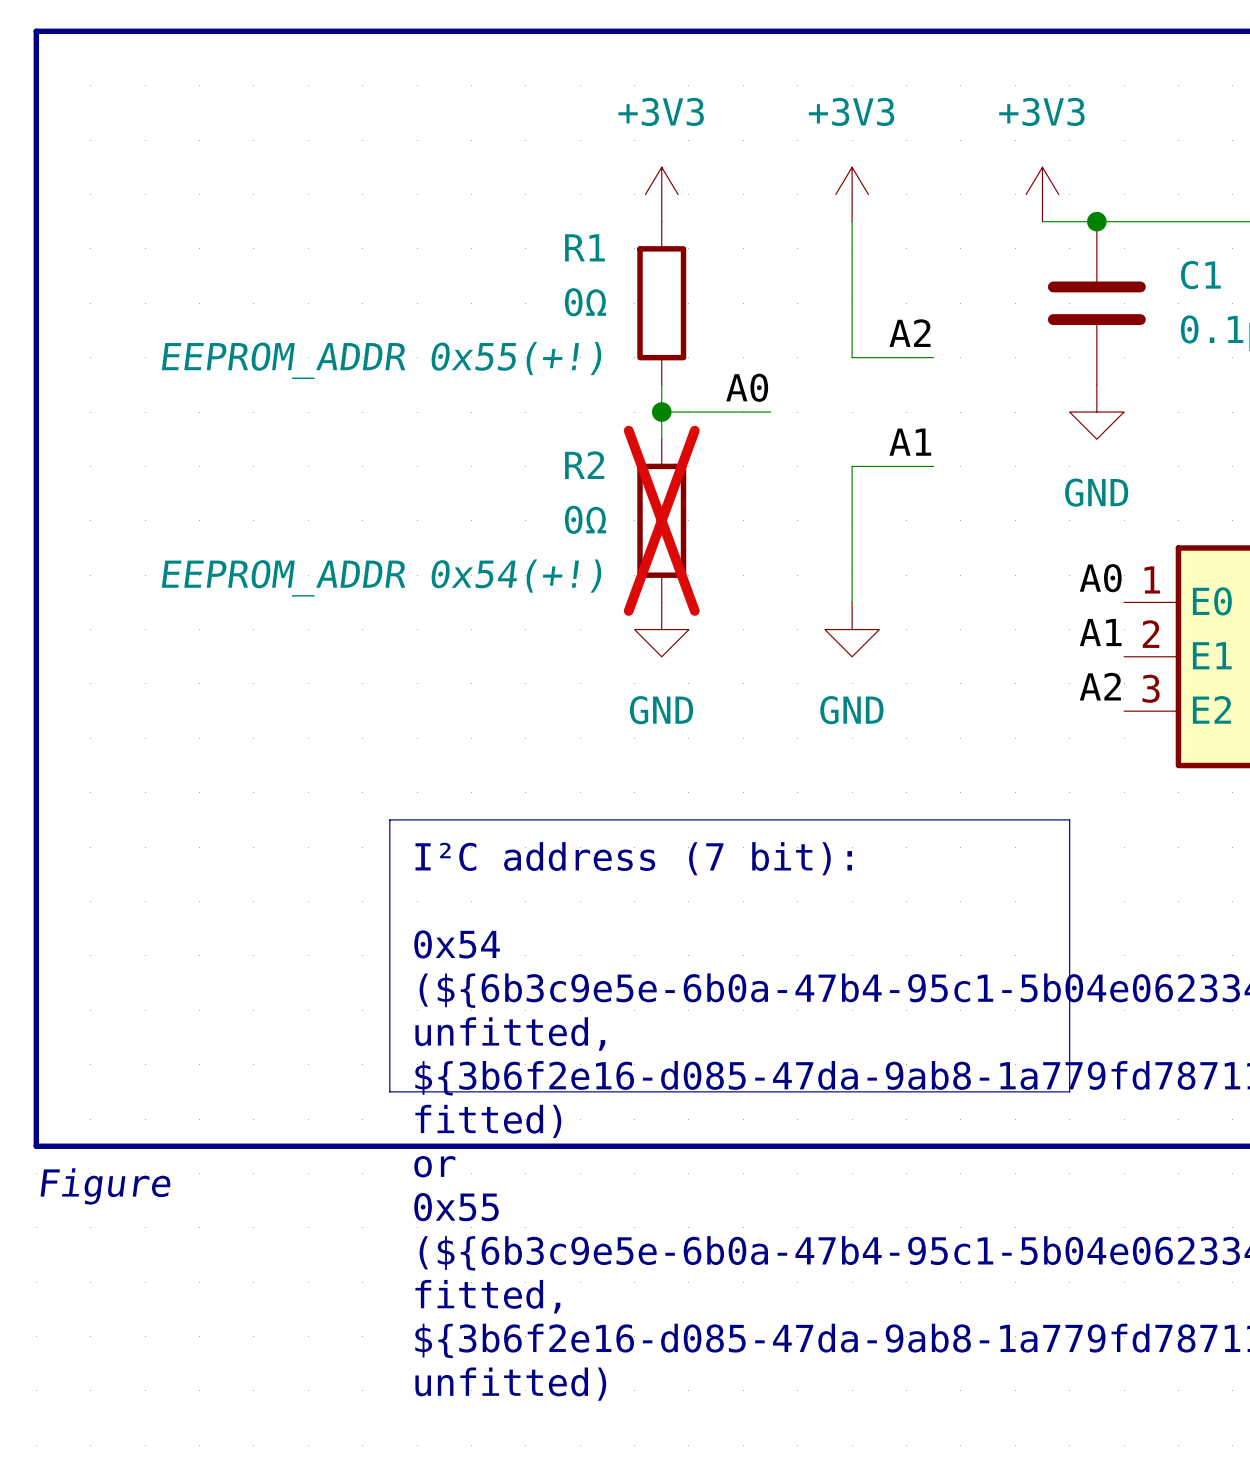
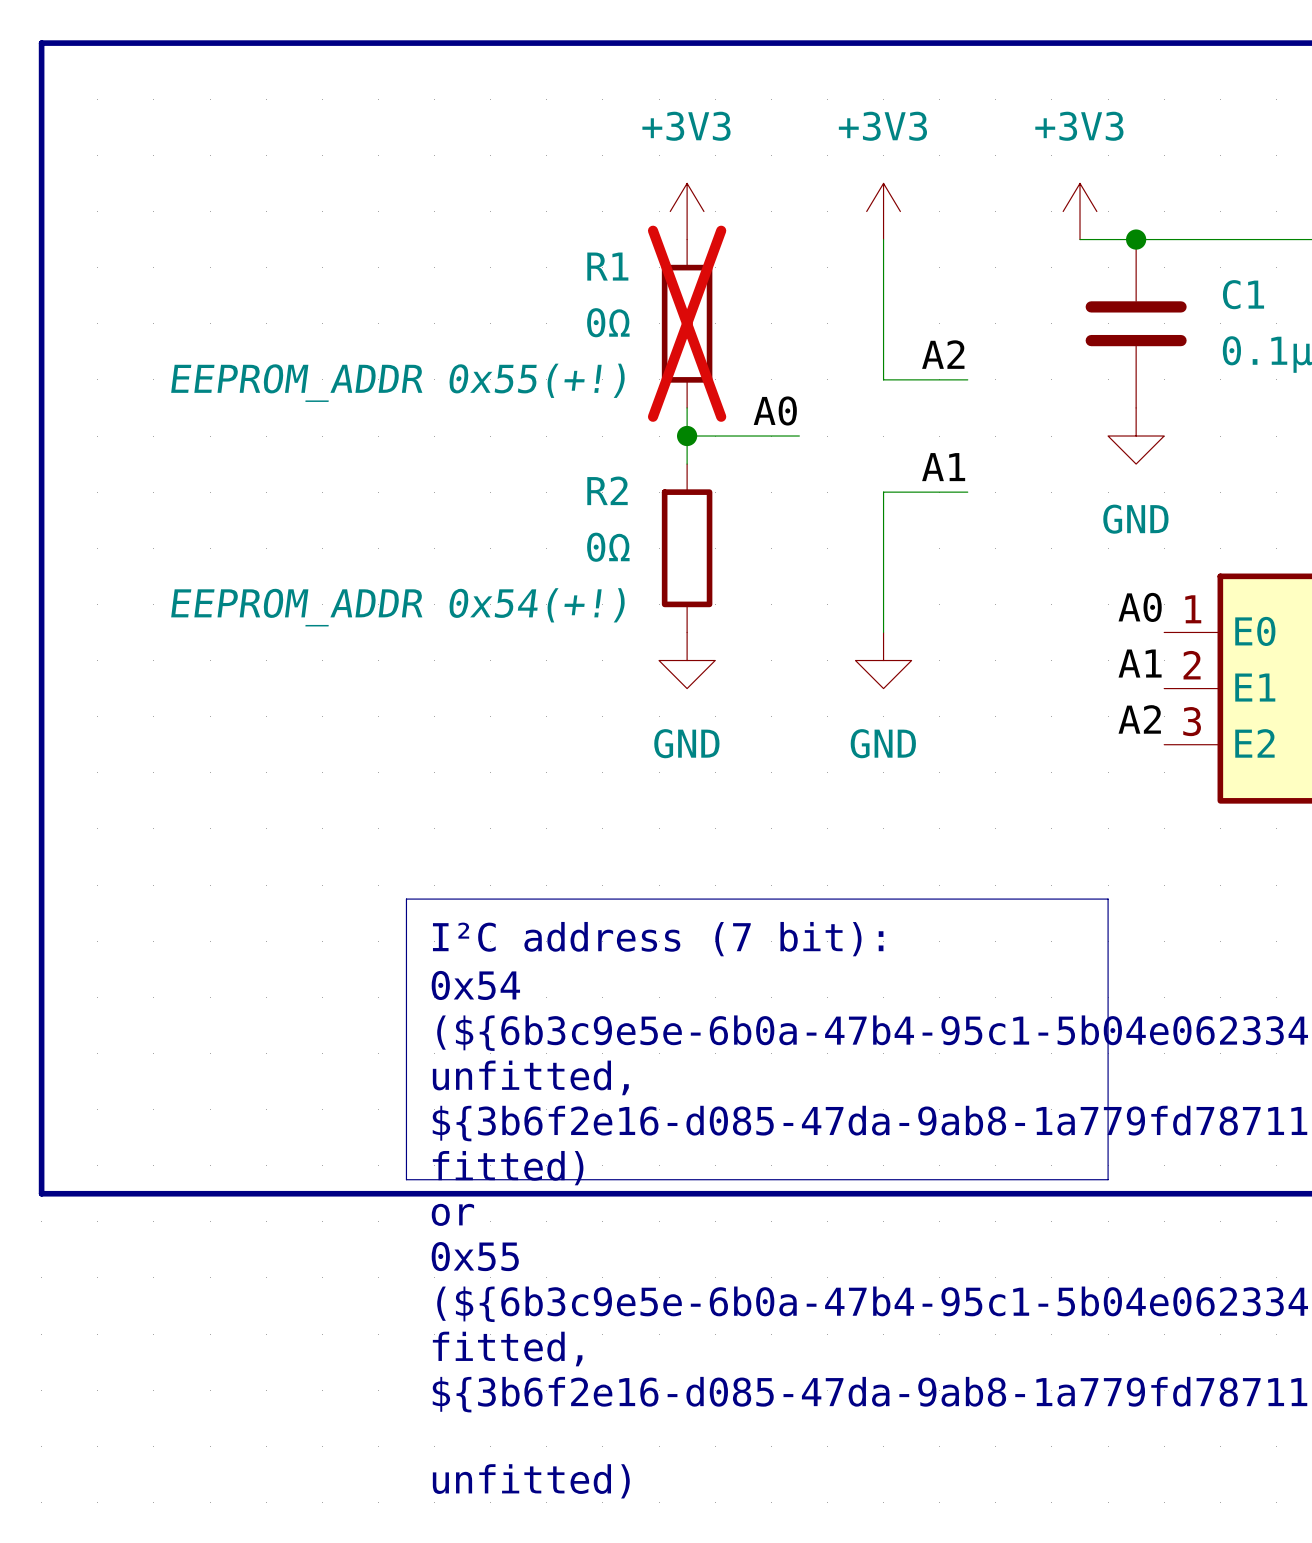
R1 do-not-place cross: none -> (687, 323)
R2 do-not-place cross: (661, 520) -> none
text position: I²C address (7 bit): (633, 858) -> I²C address (7 bit): (658, 939)
line: (389, 860) (389, 819) (1069, 819) (1069, 860) -> (406, 899) (1108, 899)
line: (389, 1091) (1069, 1091) -> (406, 1137) (406, 1179) (1108, 1179) (1108, 1137)
text: Figure (105, 1186) -> none
text position: unfitted) (510, 1384) -> unfitted) (531, 1481)

